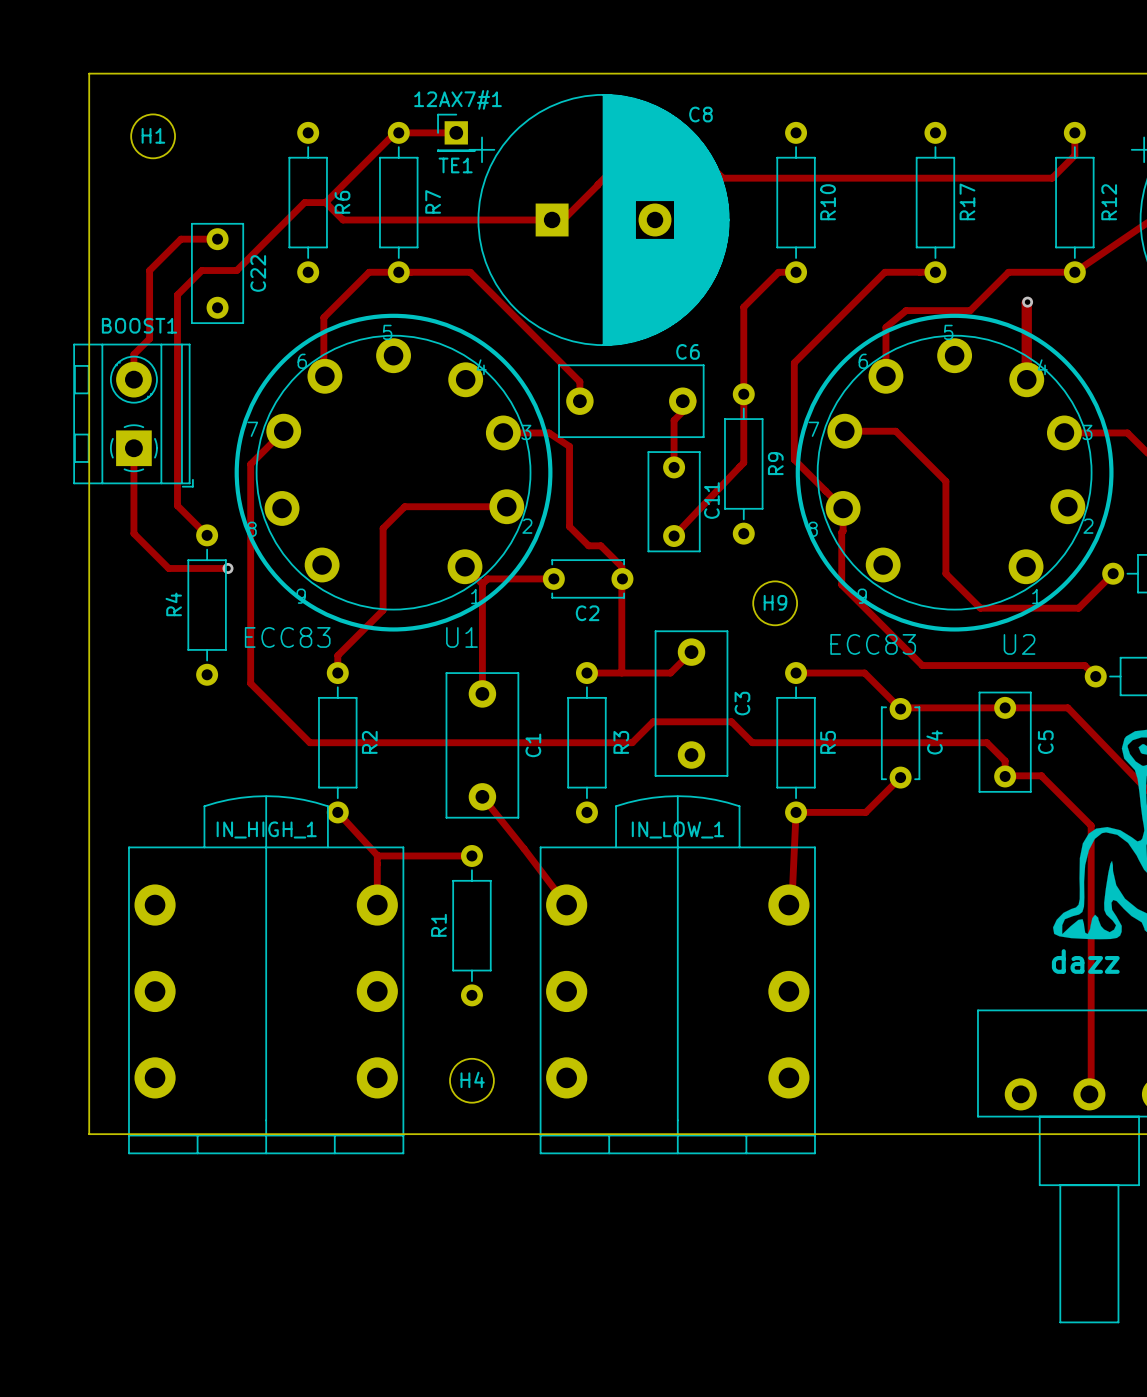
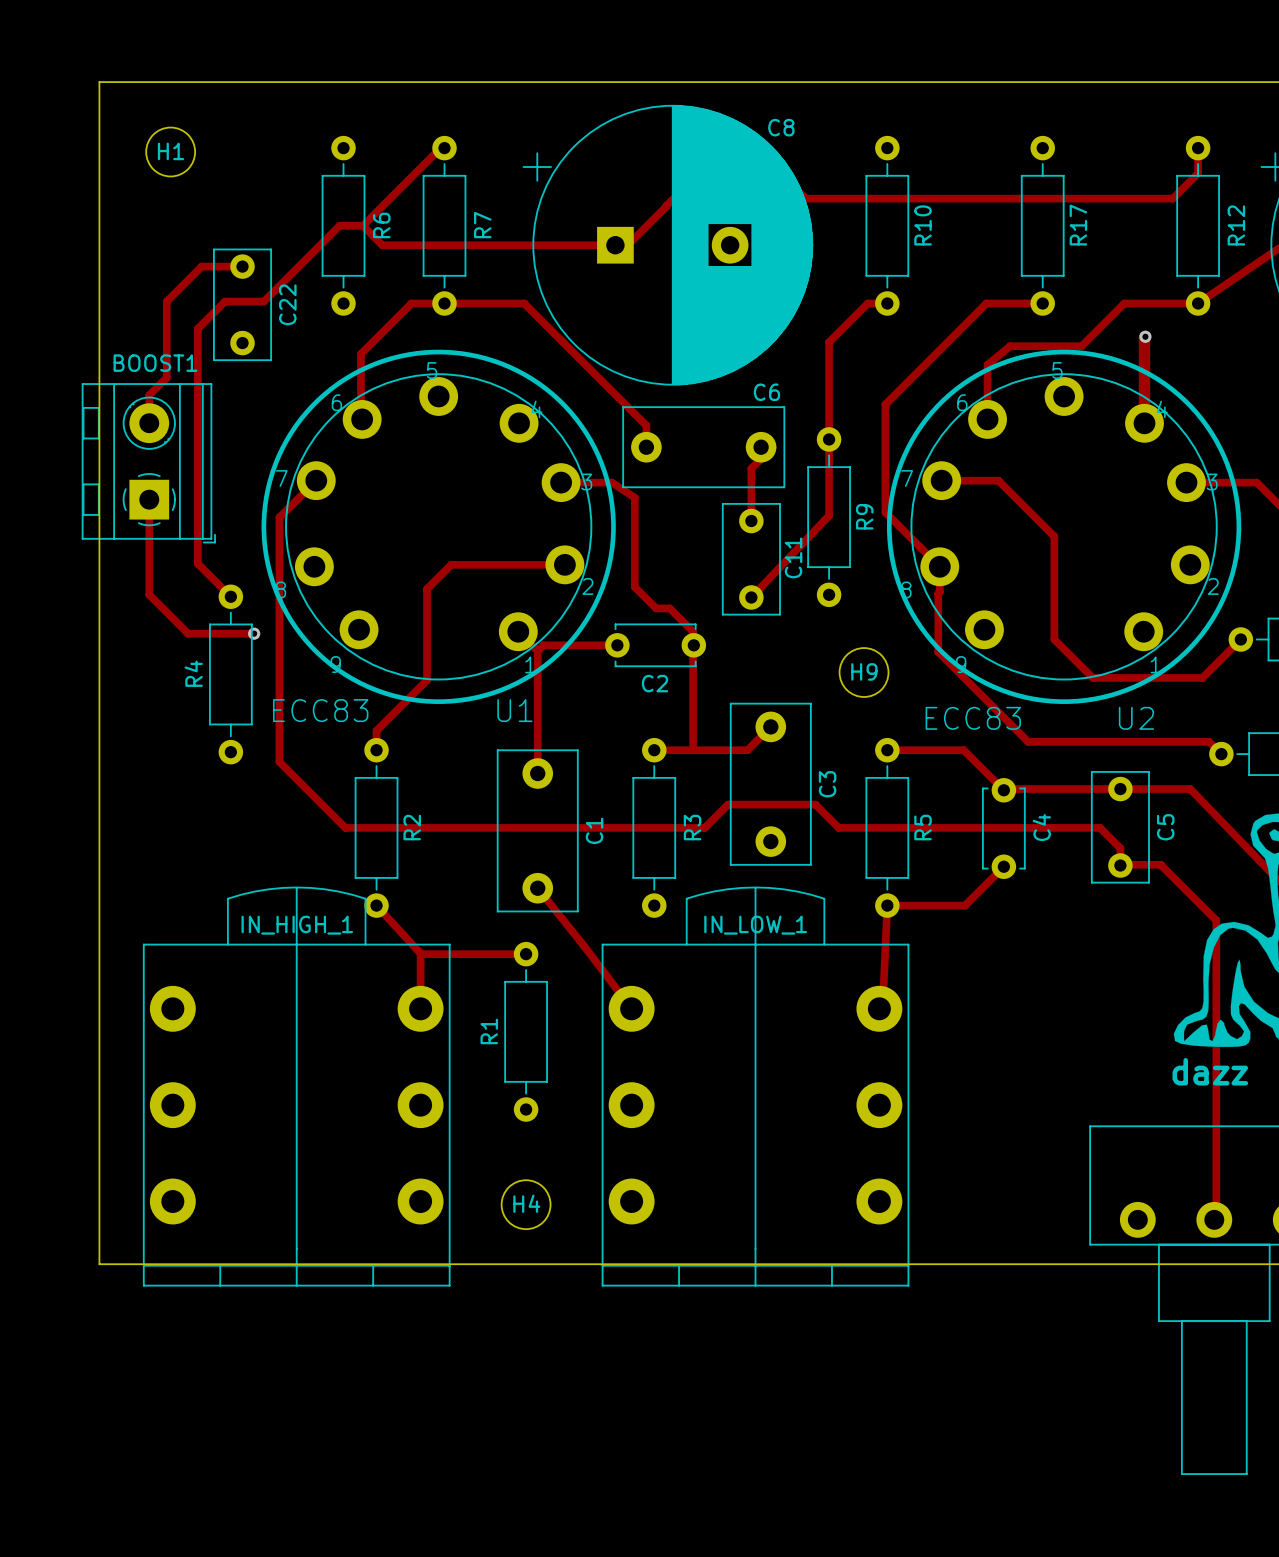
text: 12AX7#1 (458, 99) -> none
track: (398, 132) (456, 132) (458, 134) -> none
TE1: (456, 132) -> none

